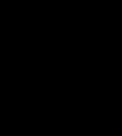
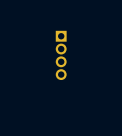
part: none -> (61, 55)

